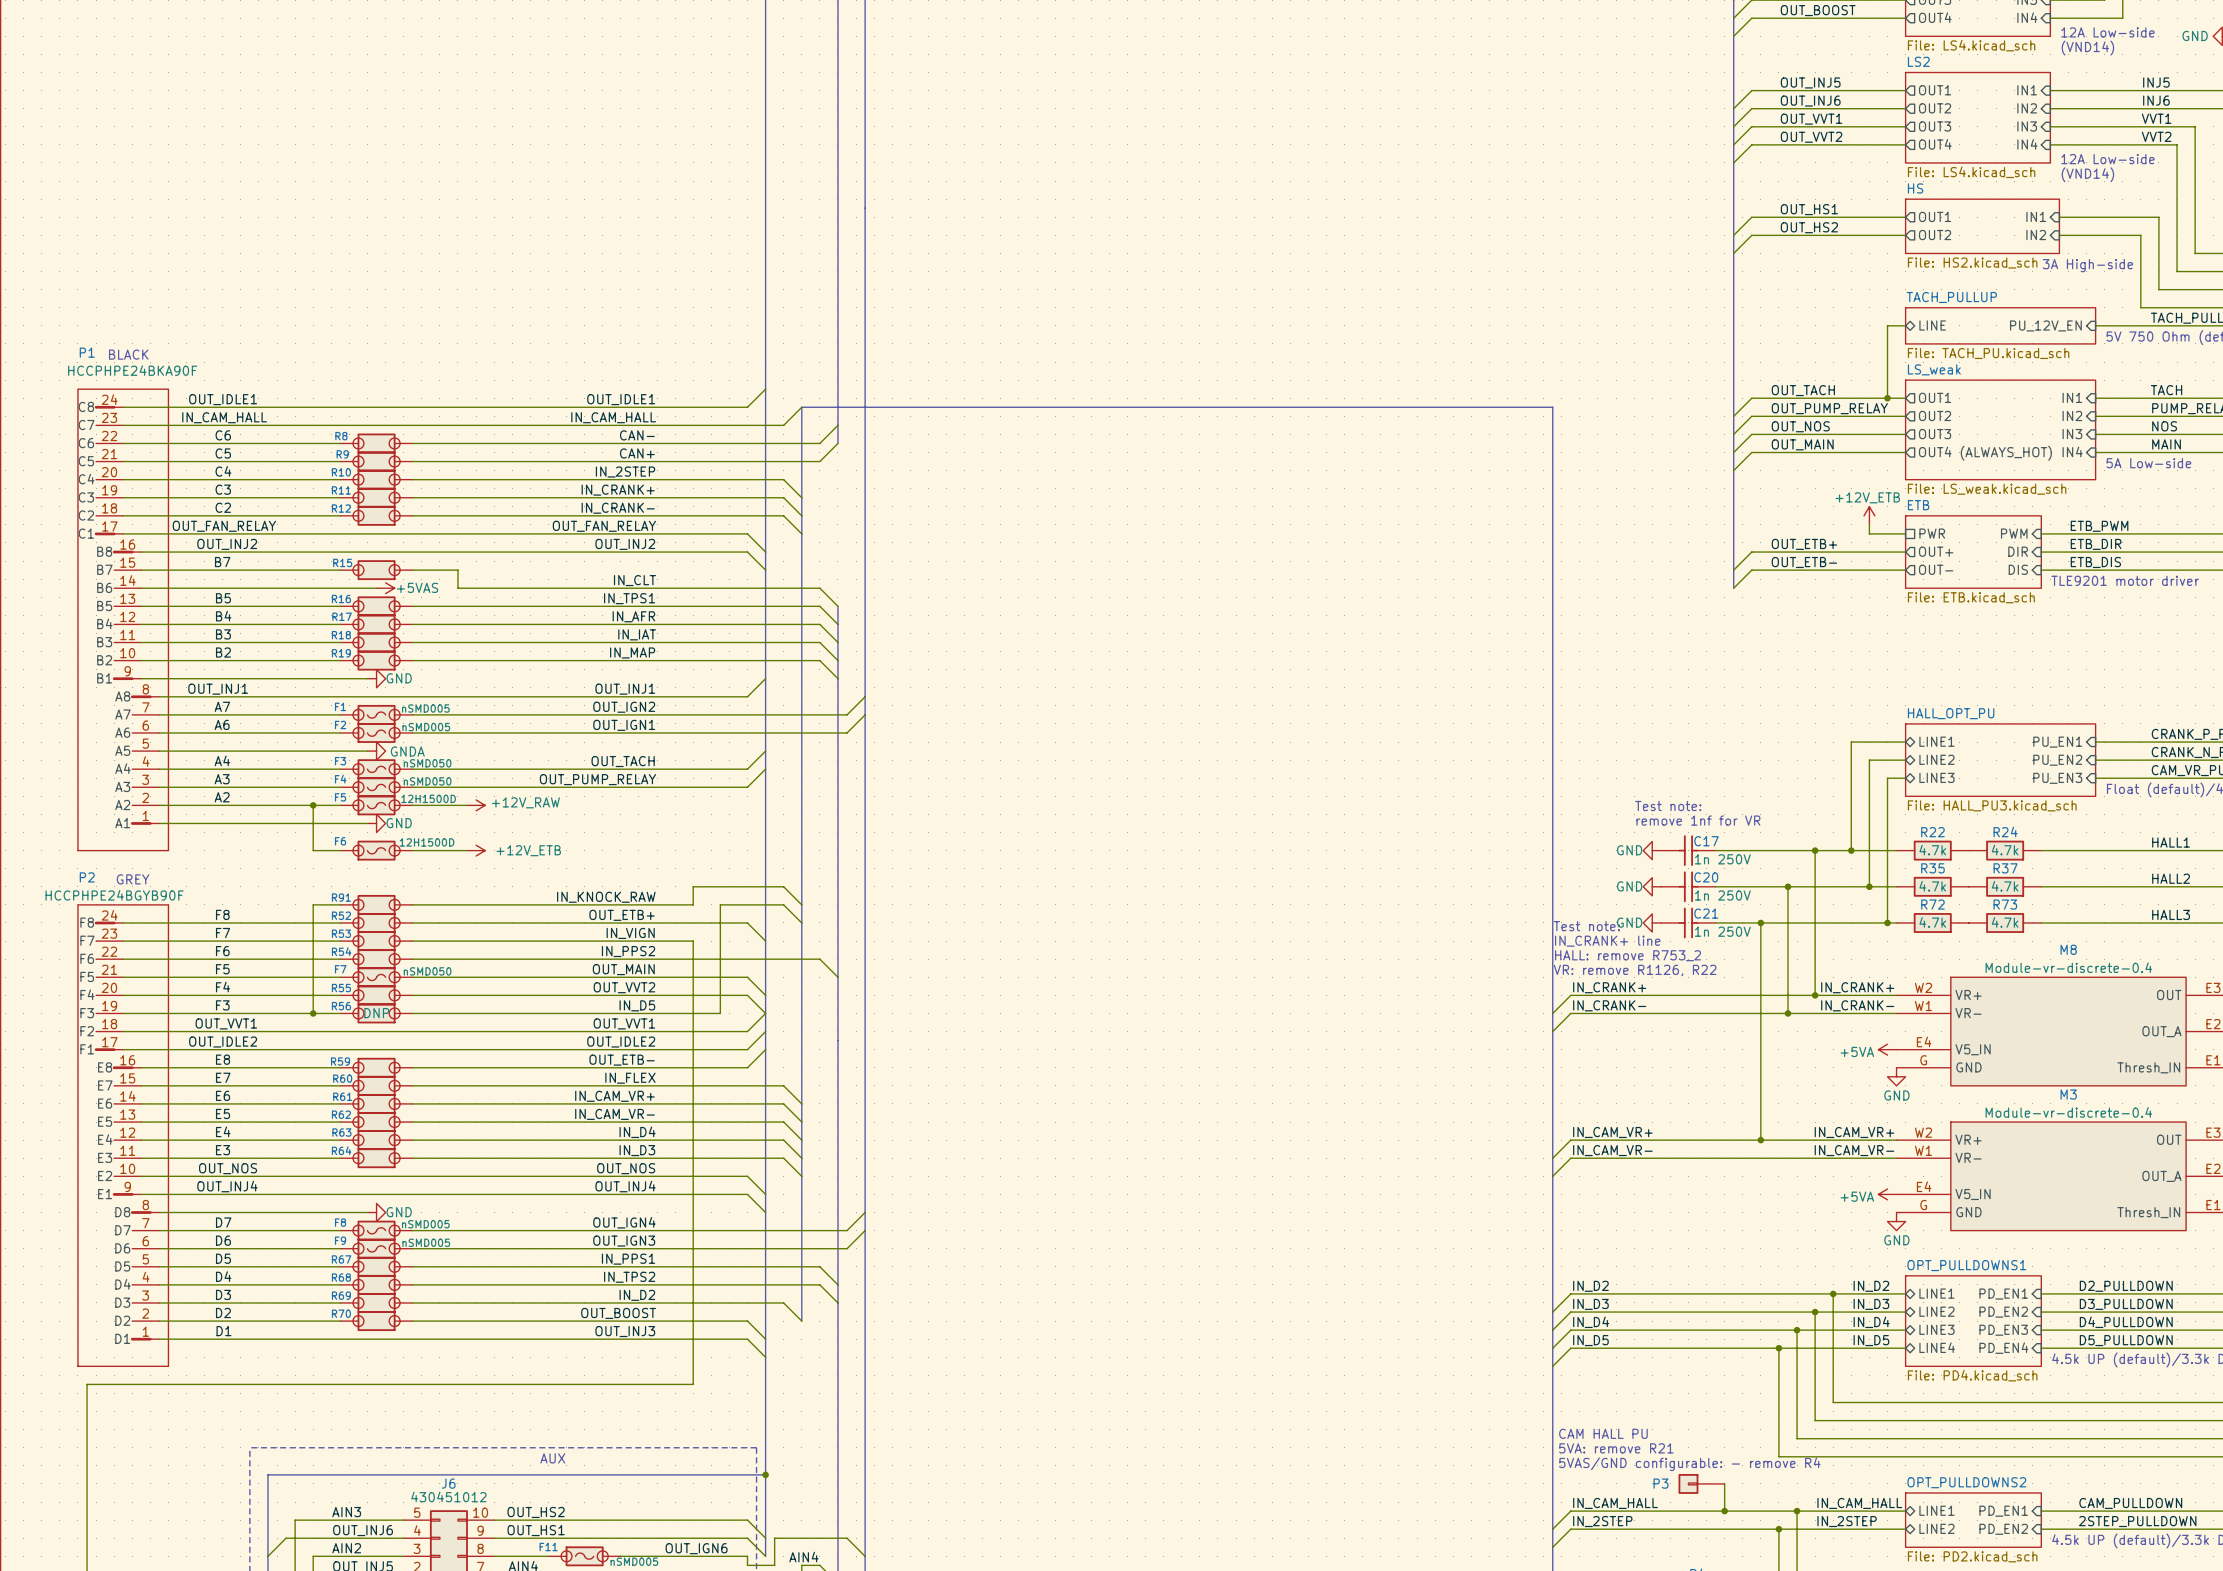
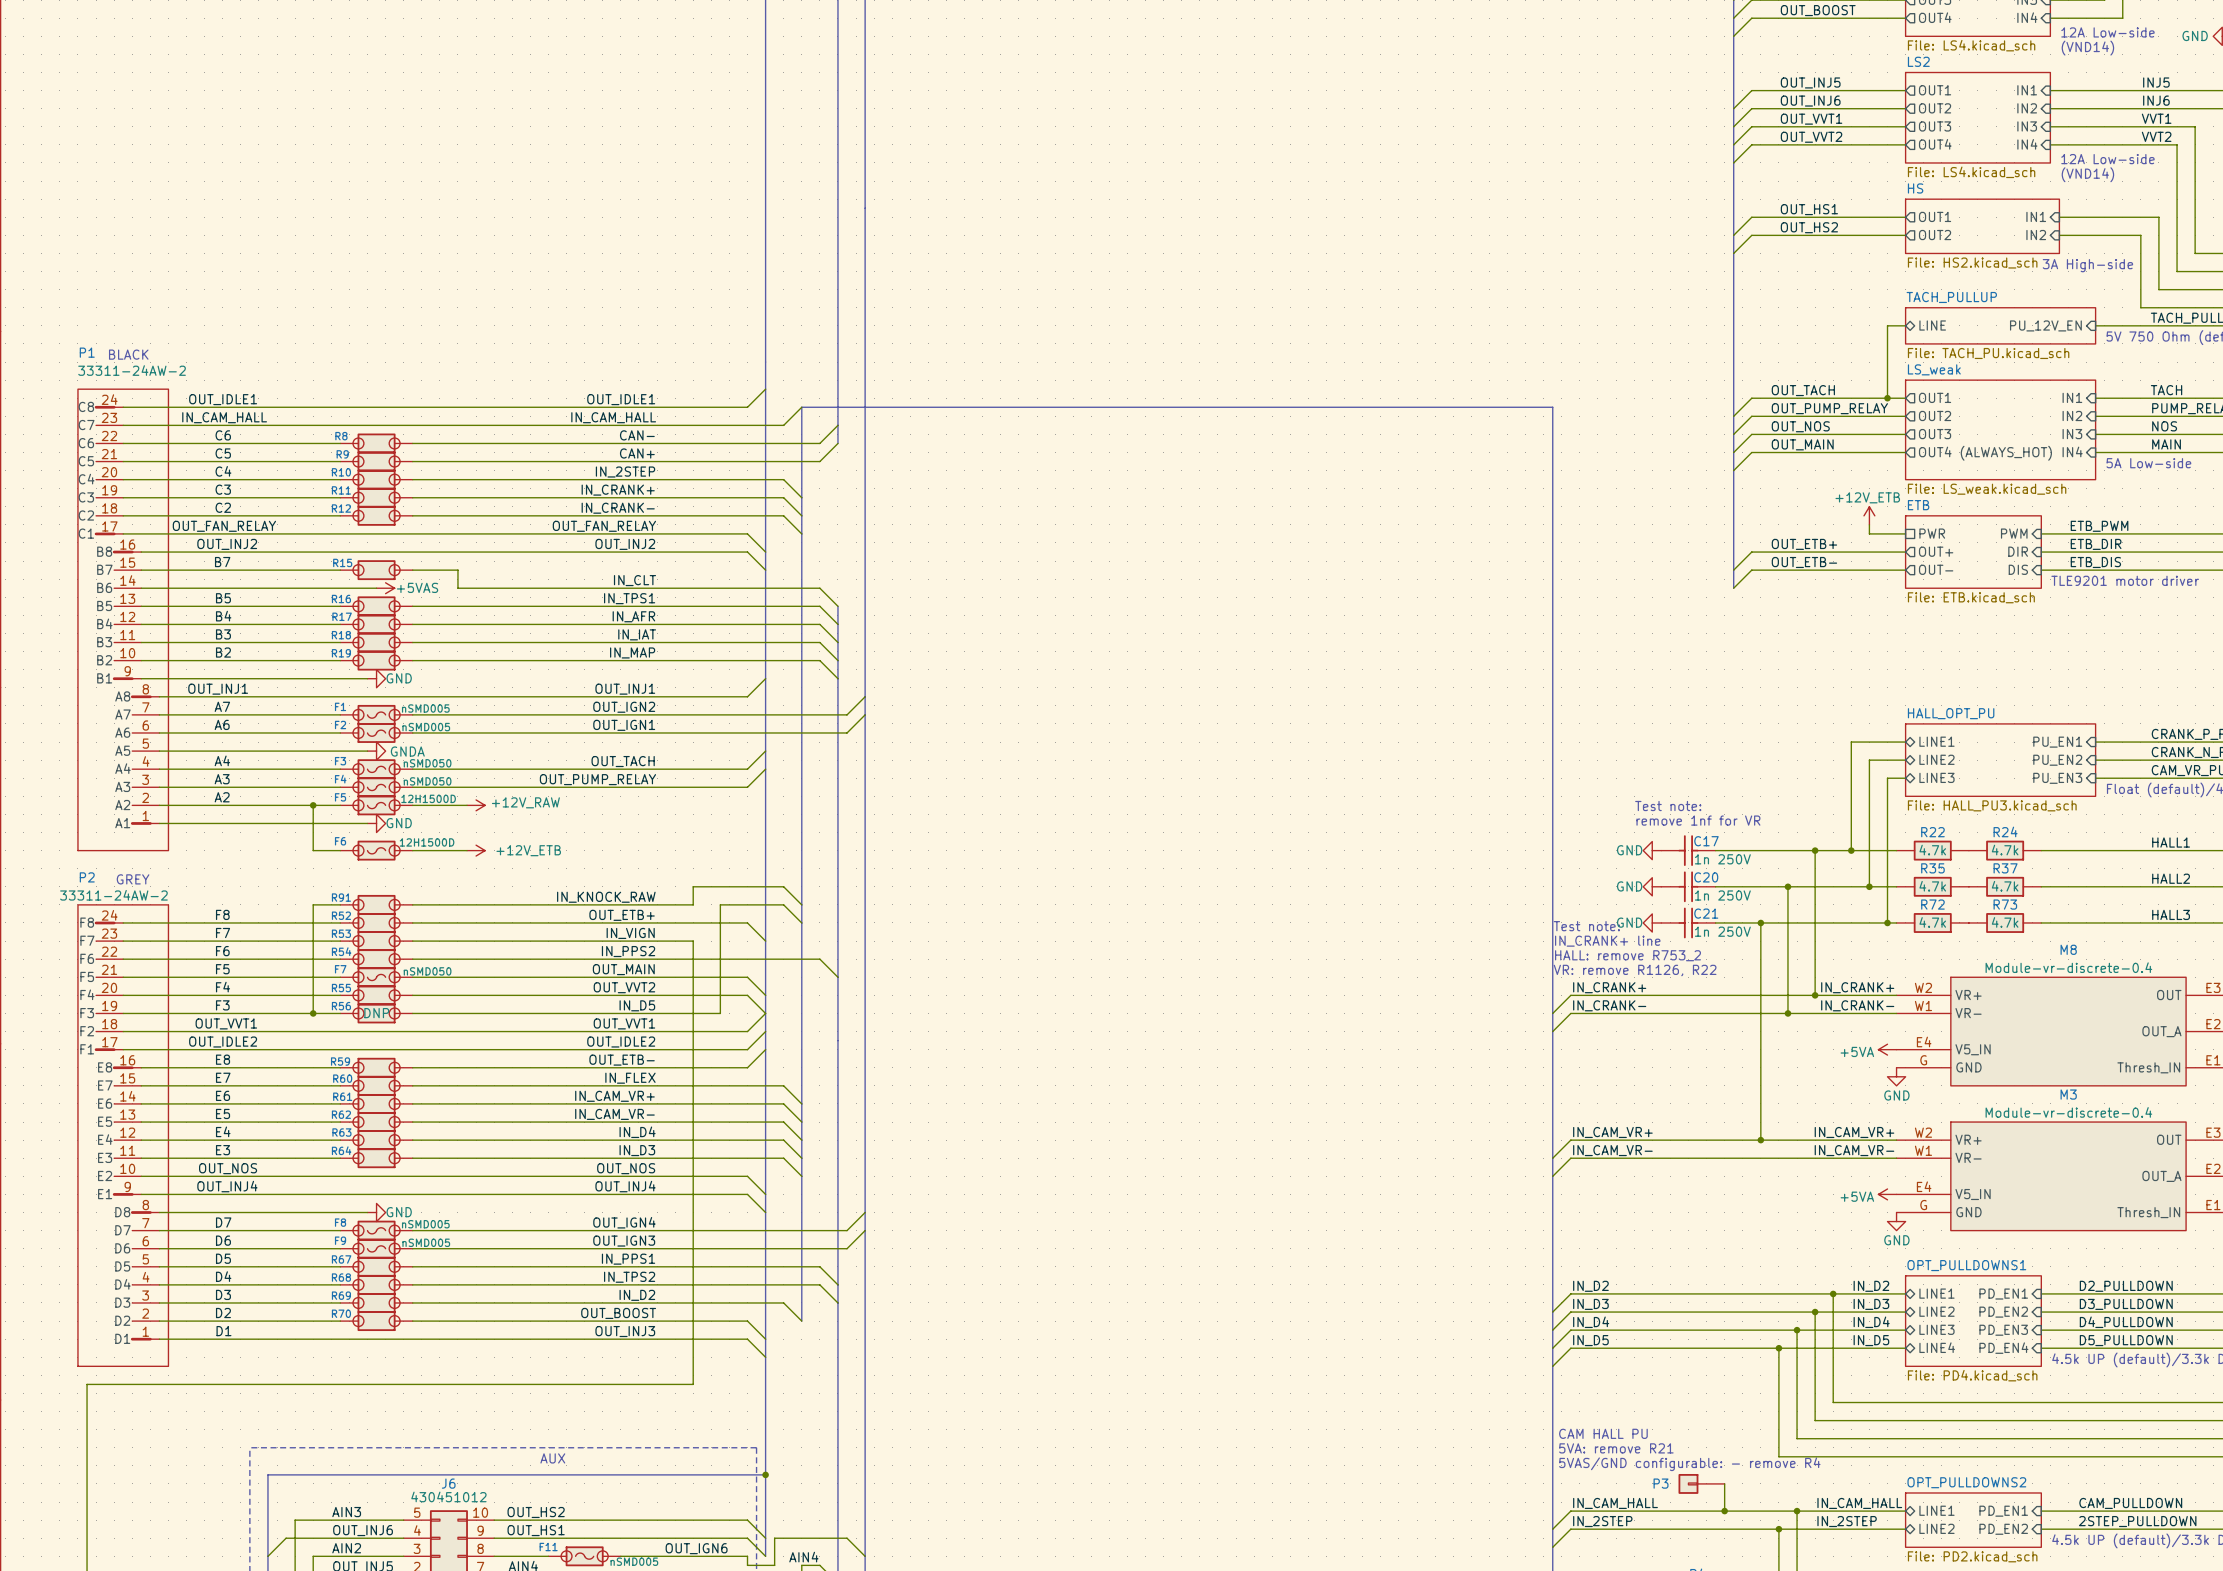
P1 value: HCCPHPE24BKA90F (132, 370) -> 33311-24AW-2 (132, 370)
P2 value: HCCPHPE24BGYB90F (114, 895) -> 33311-24AW-2 (113, 895)

